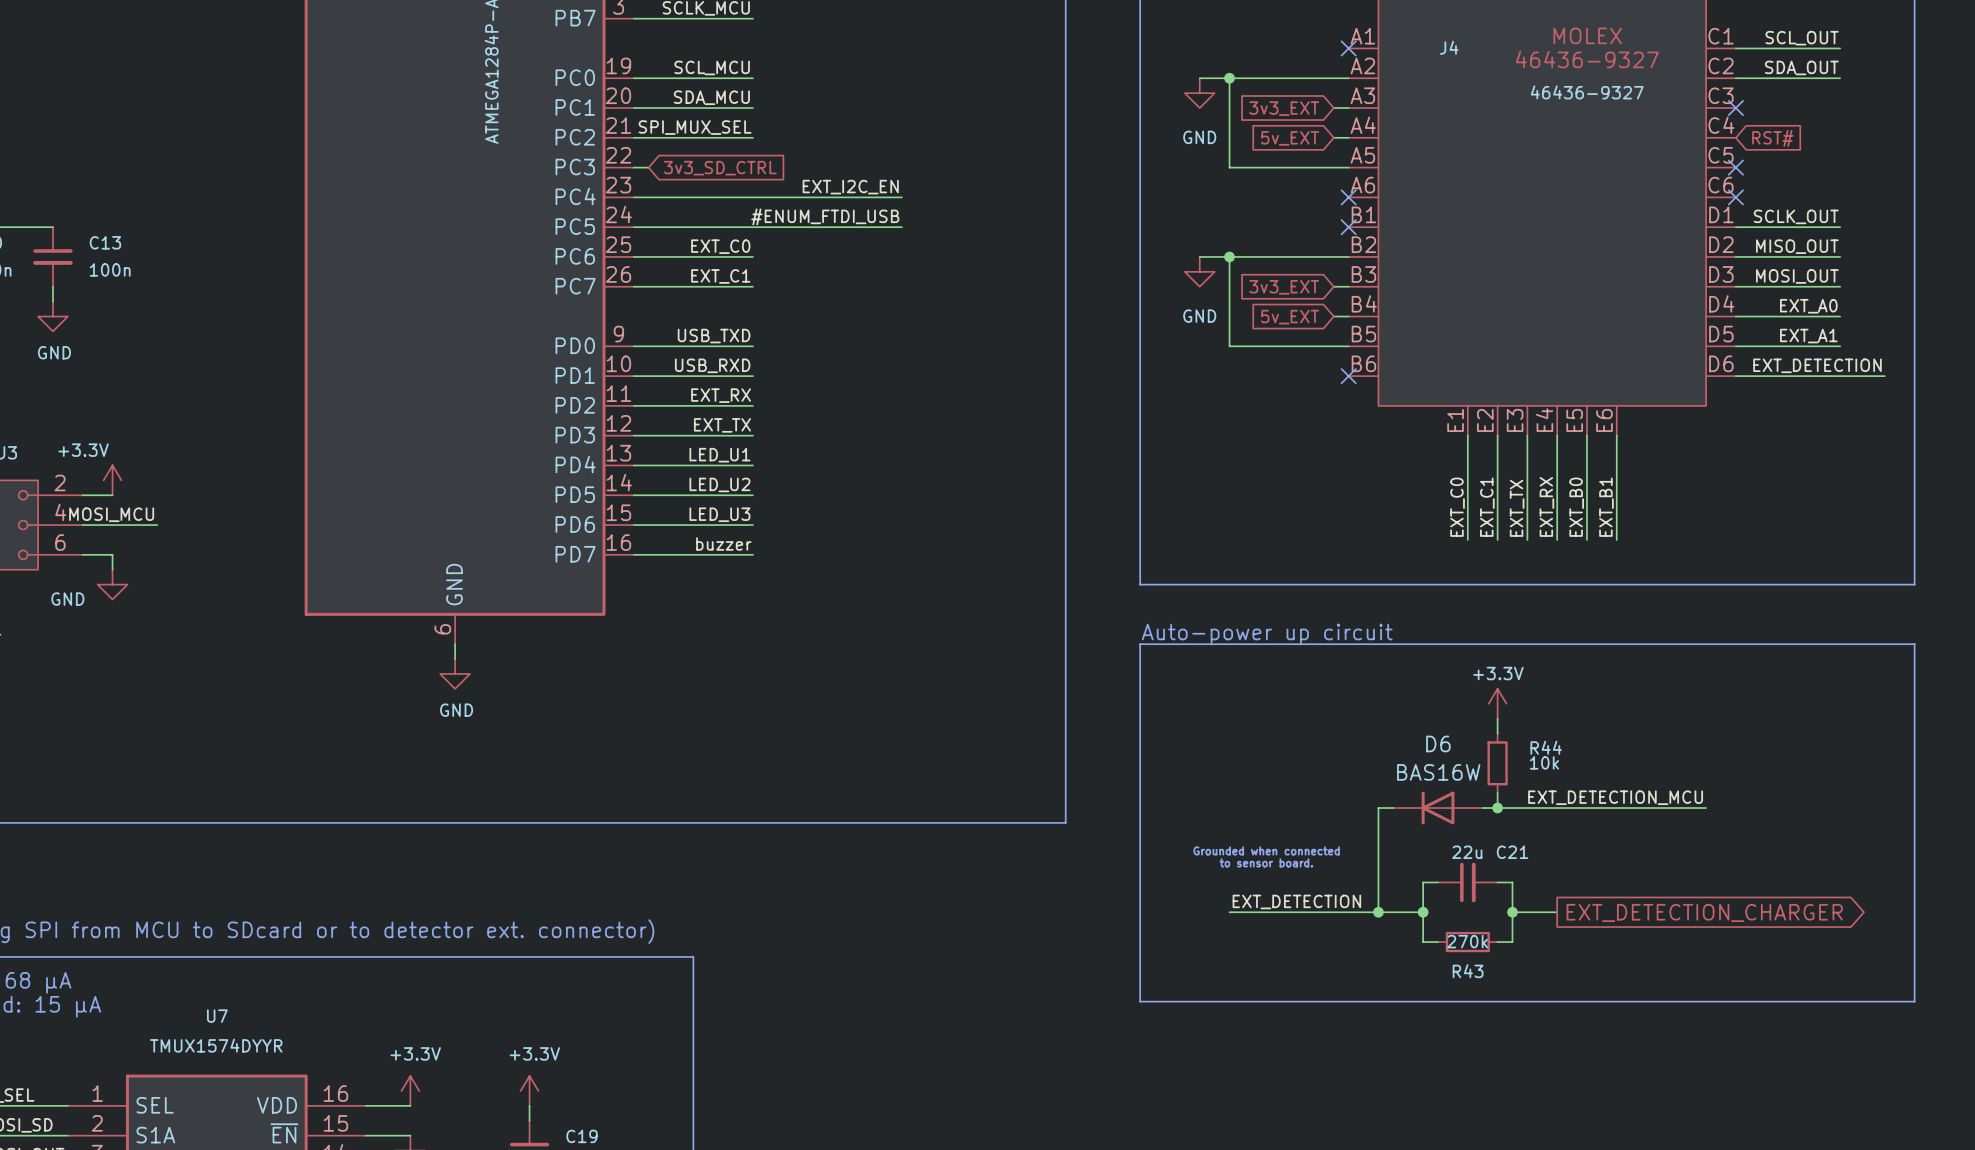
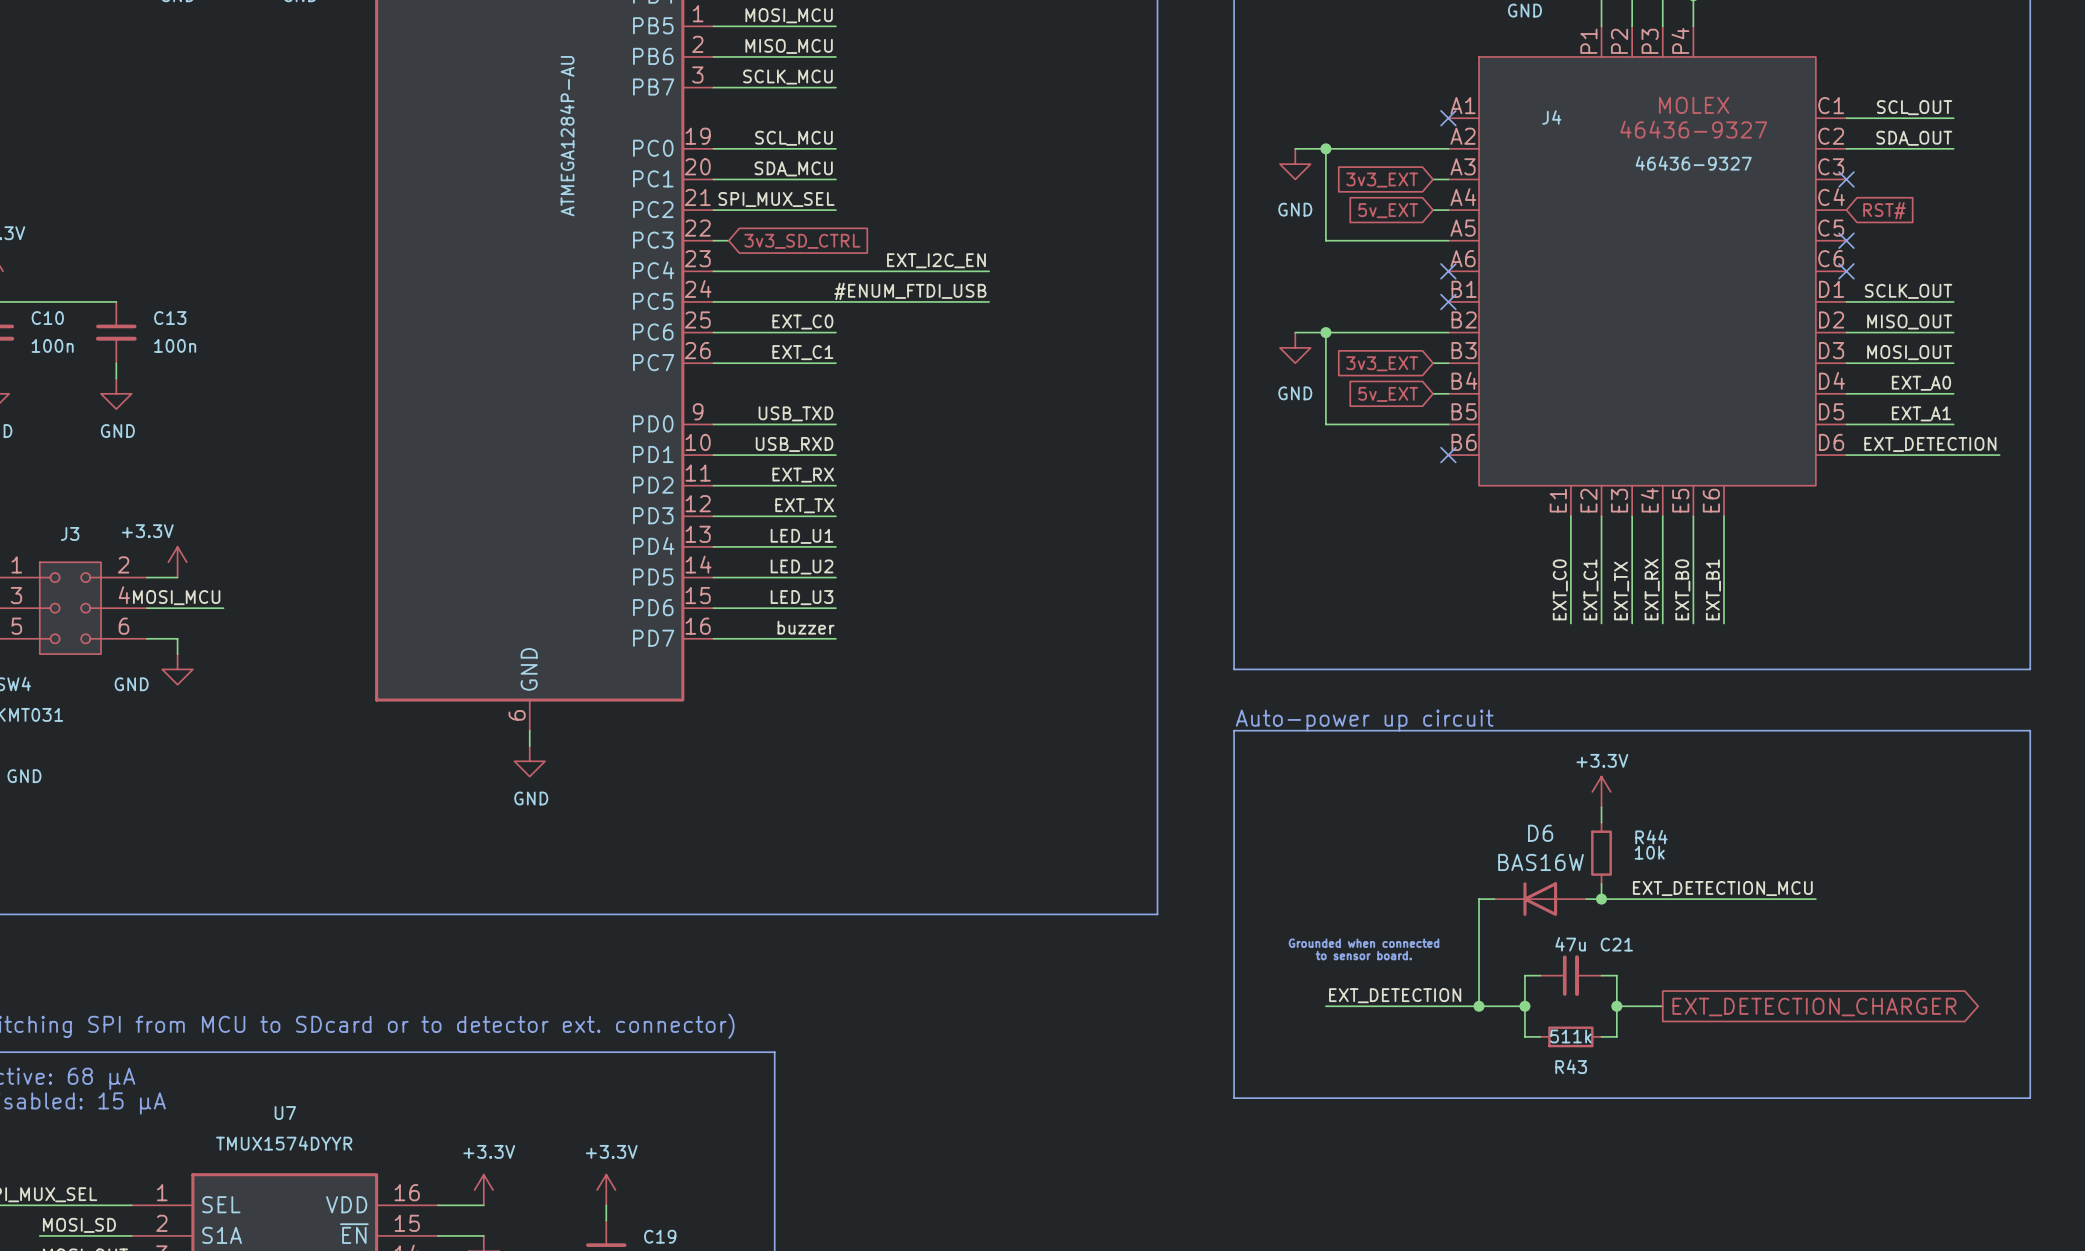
C21 value: 22u (1467, 852) -> 47u (1570, 944)
R43 value: 270k (1467, 941) -> 511k (1570, 1036)

